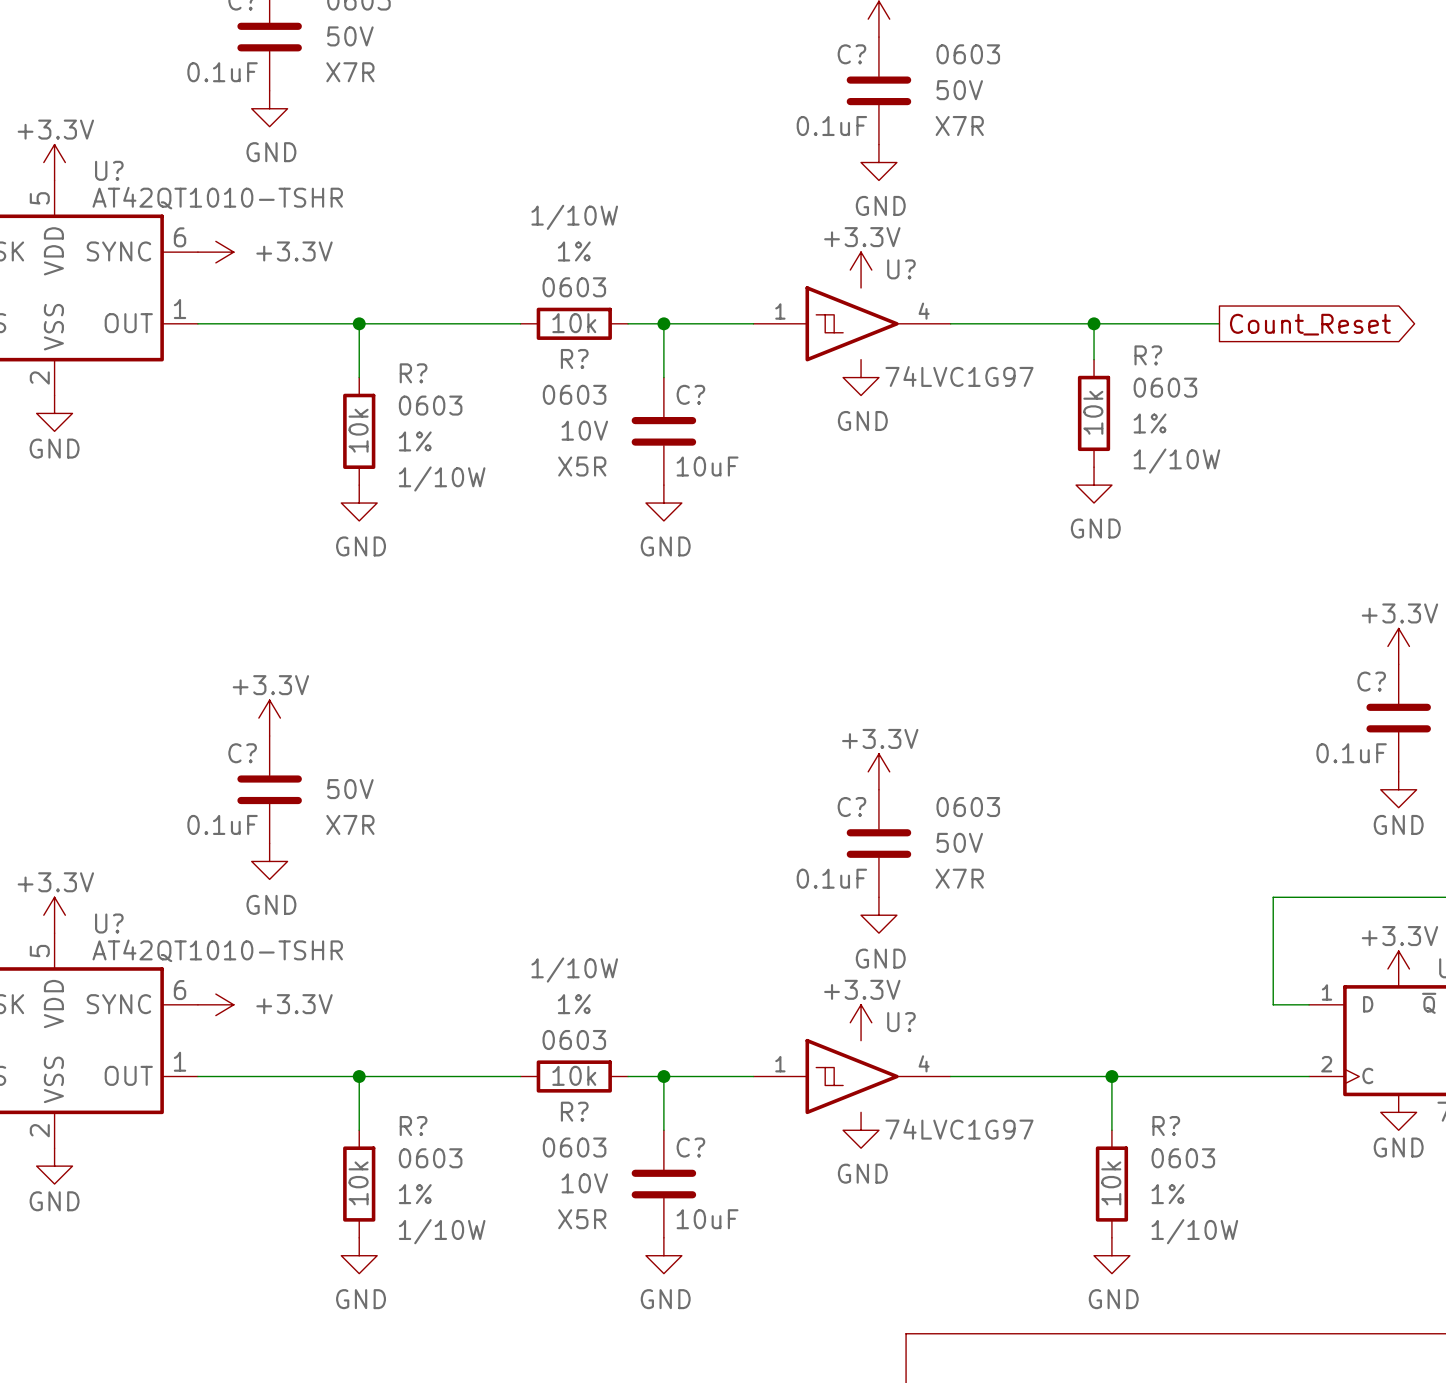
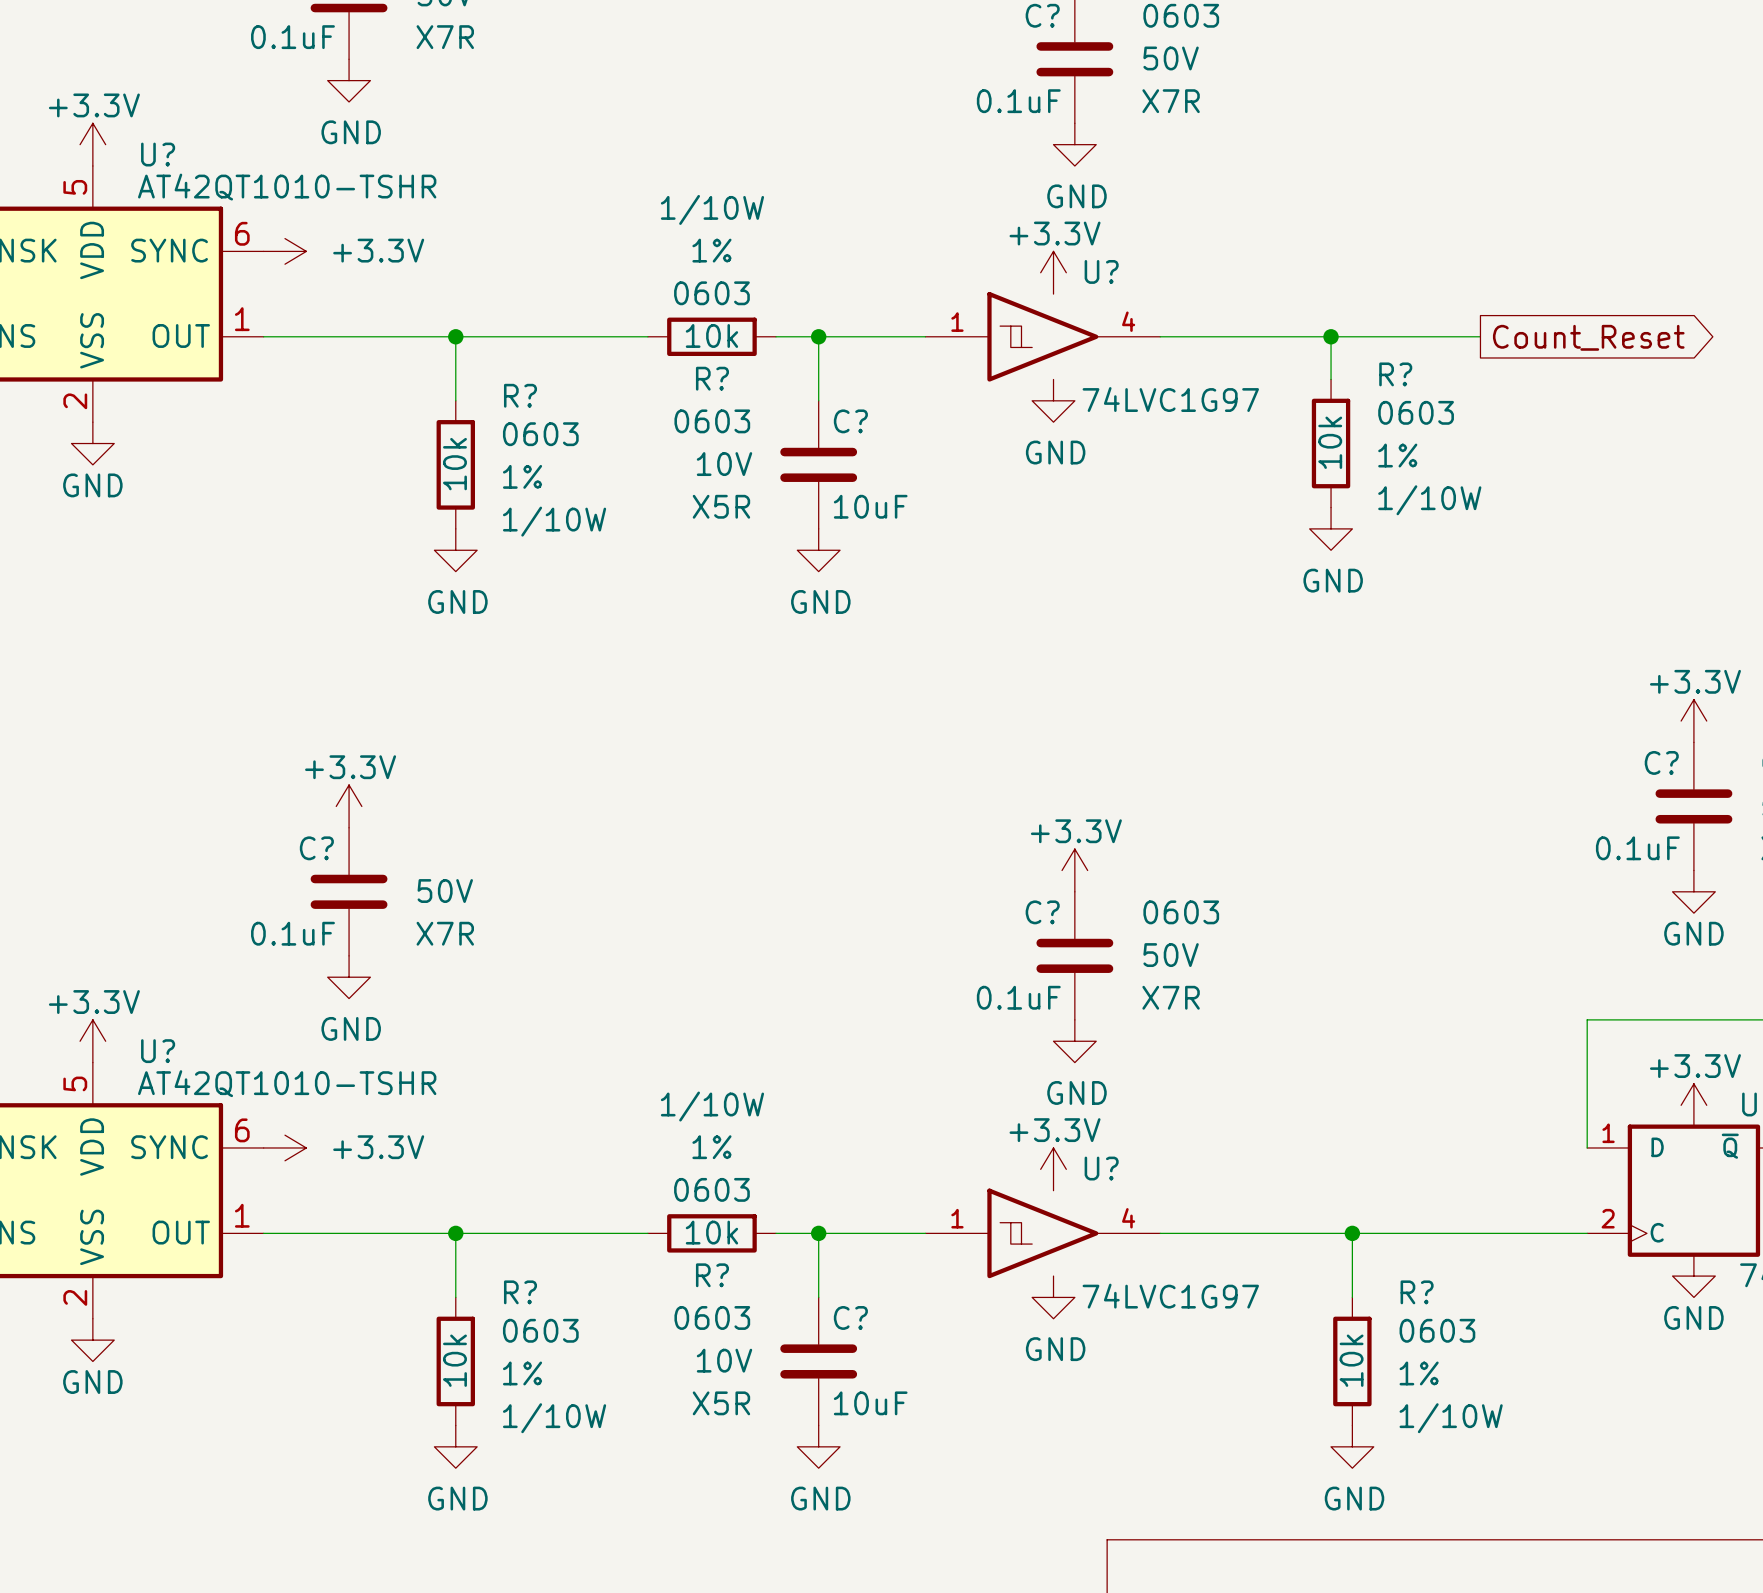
wire: (1309, 897) (1273, 897) (1273, 1004) (1309, 1004) -> (1587, 1019) (1587, 1147)

